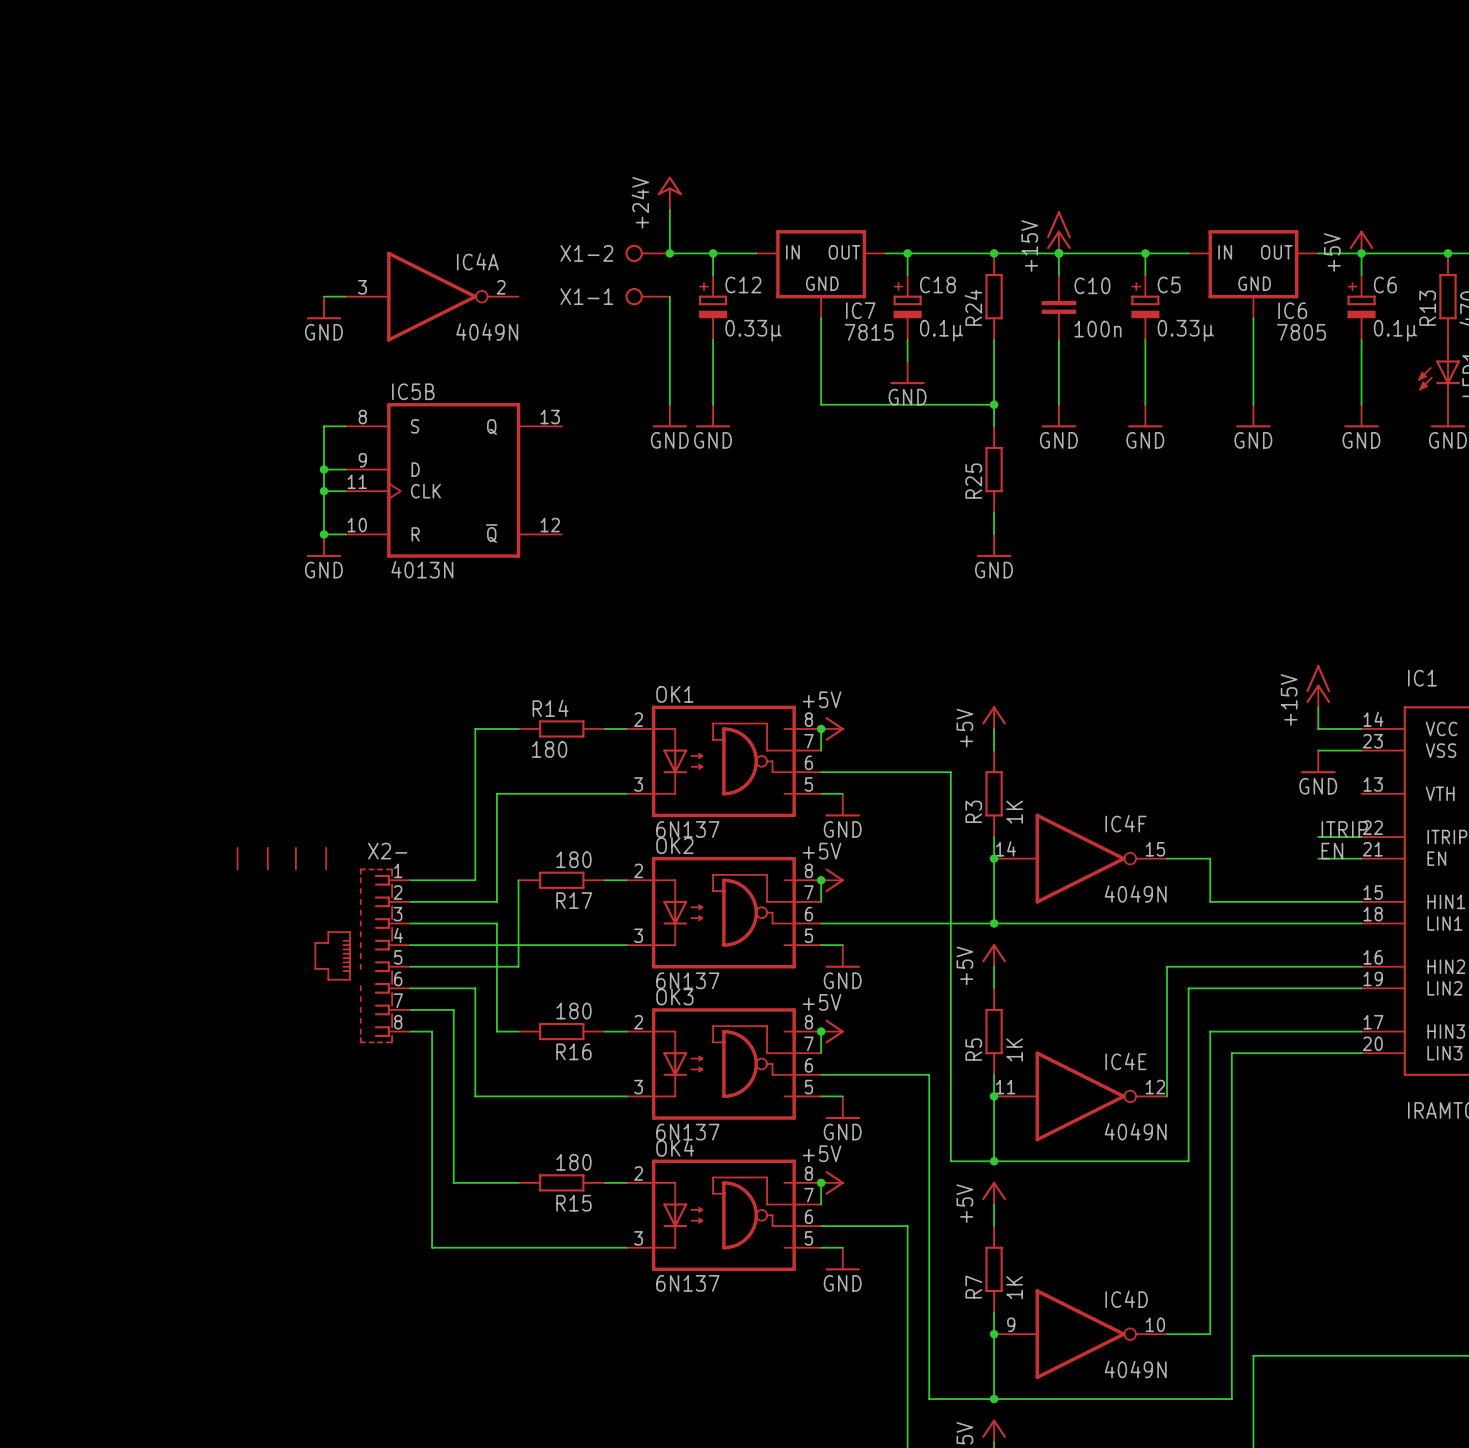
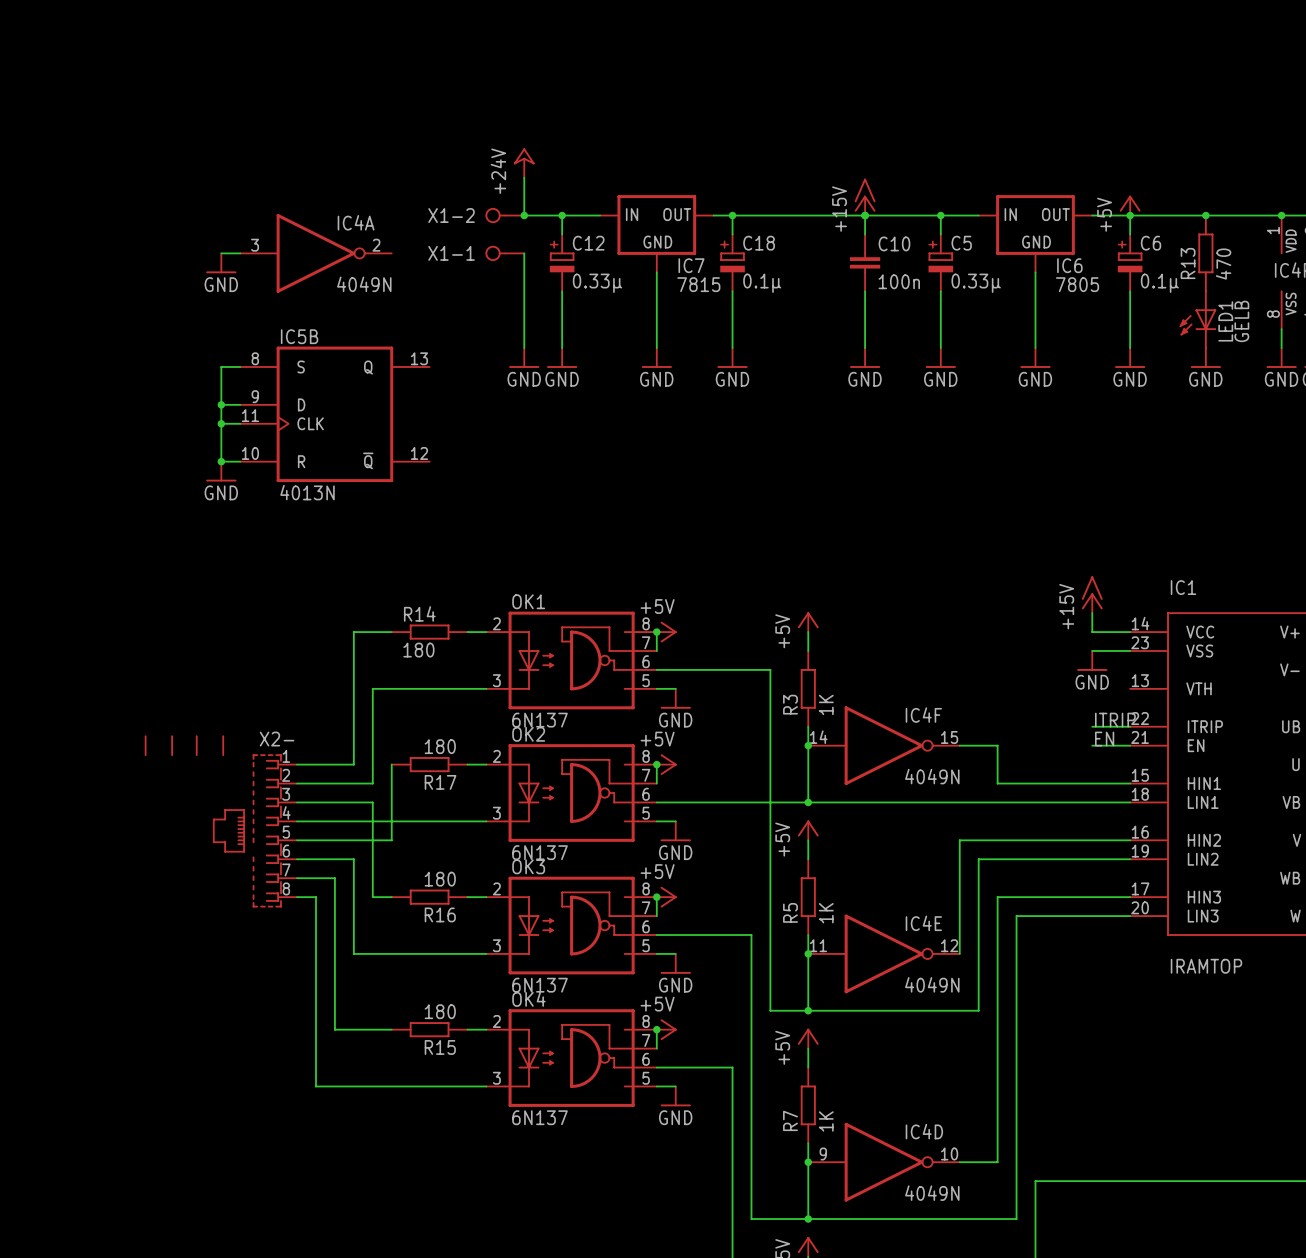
junction: (994, 253) -> none
R24: (994, 296) -> none
wire: (994, 339) (994, 426) -> none
power symbol position: GND (907, 372) -> GND (732, 358)
wire: (821, 404) (994, 404) -> none
junction: (994, 404) -> none
power symbol: none -> GND (656, 358)
R25: (994, 469) -> none
wire: (994, 512) (994, 534) -> none
power symbol: GND (994, 545) -> none

